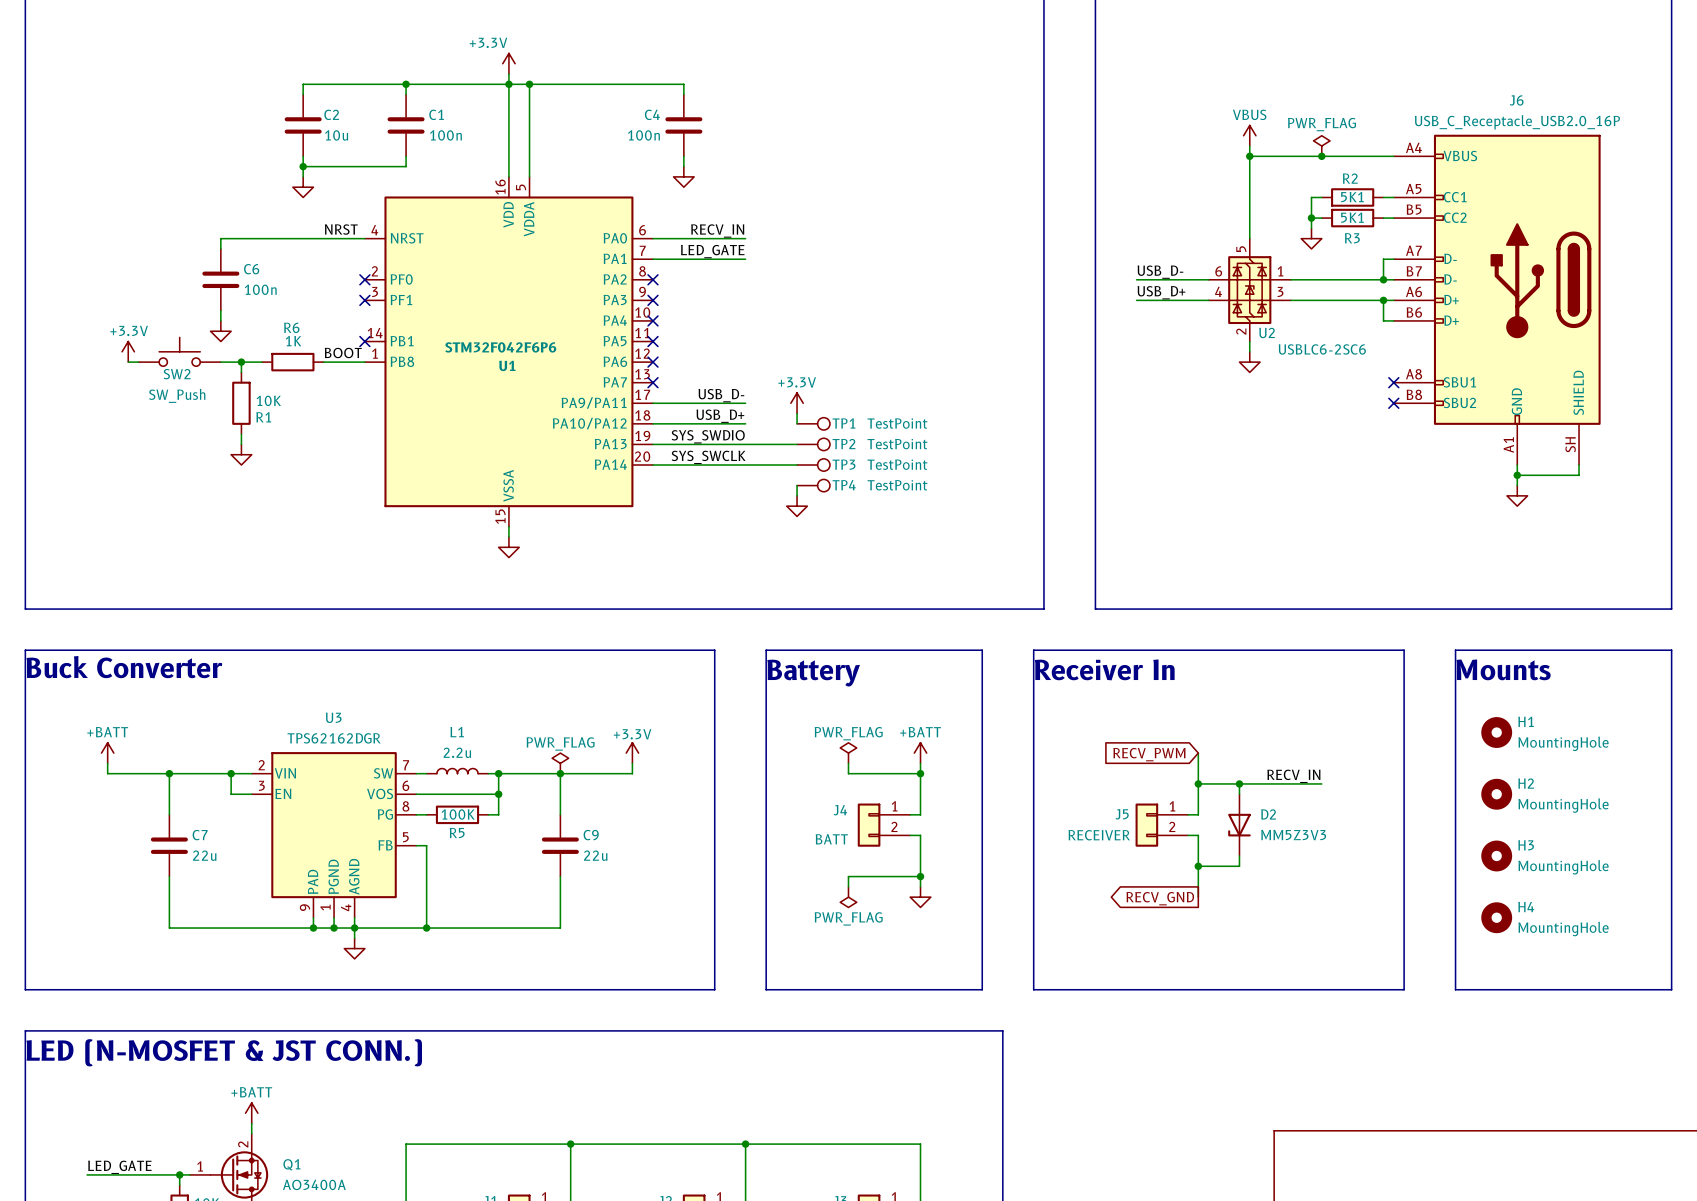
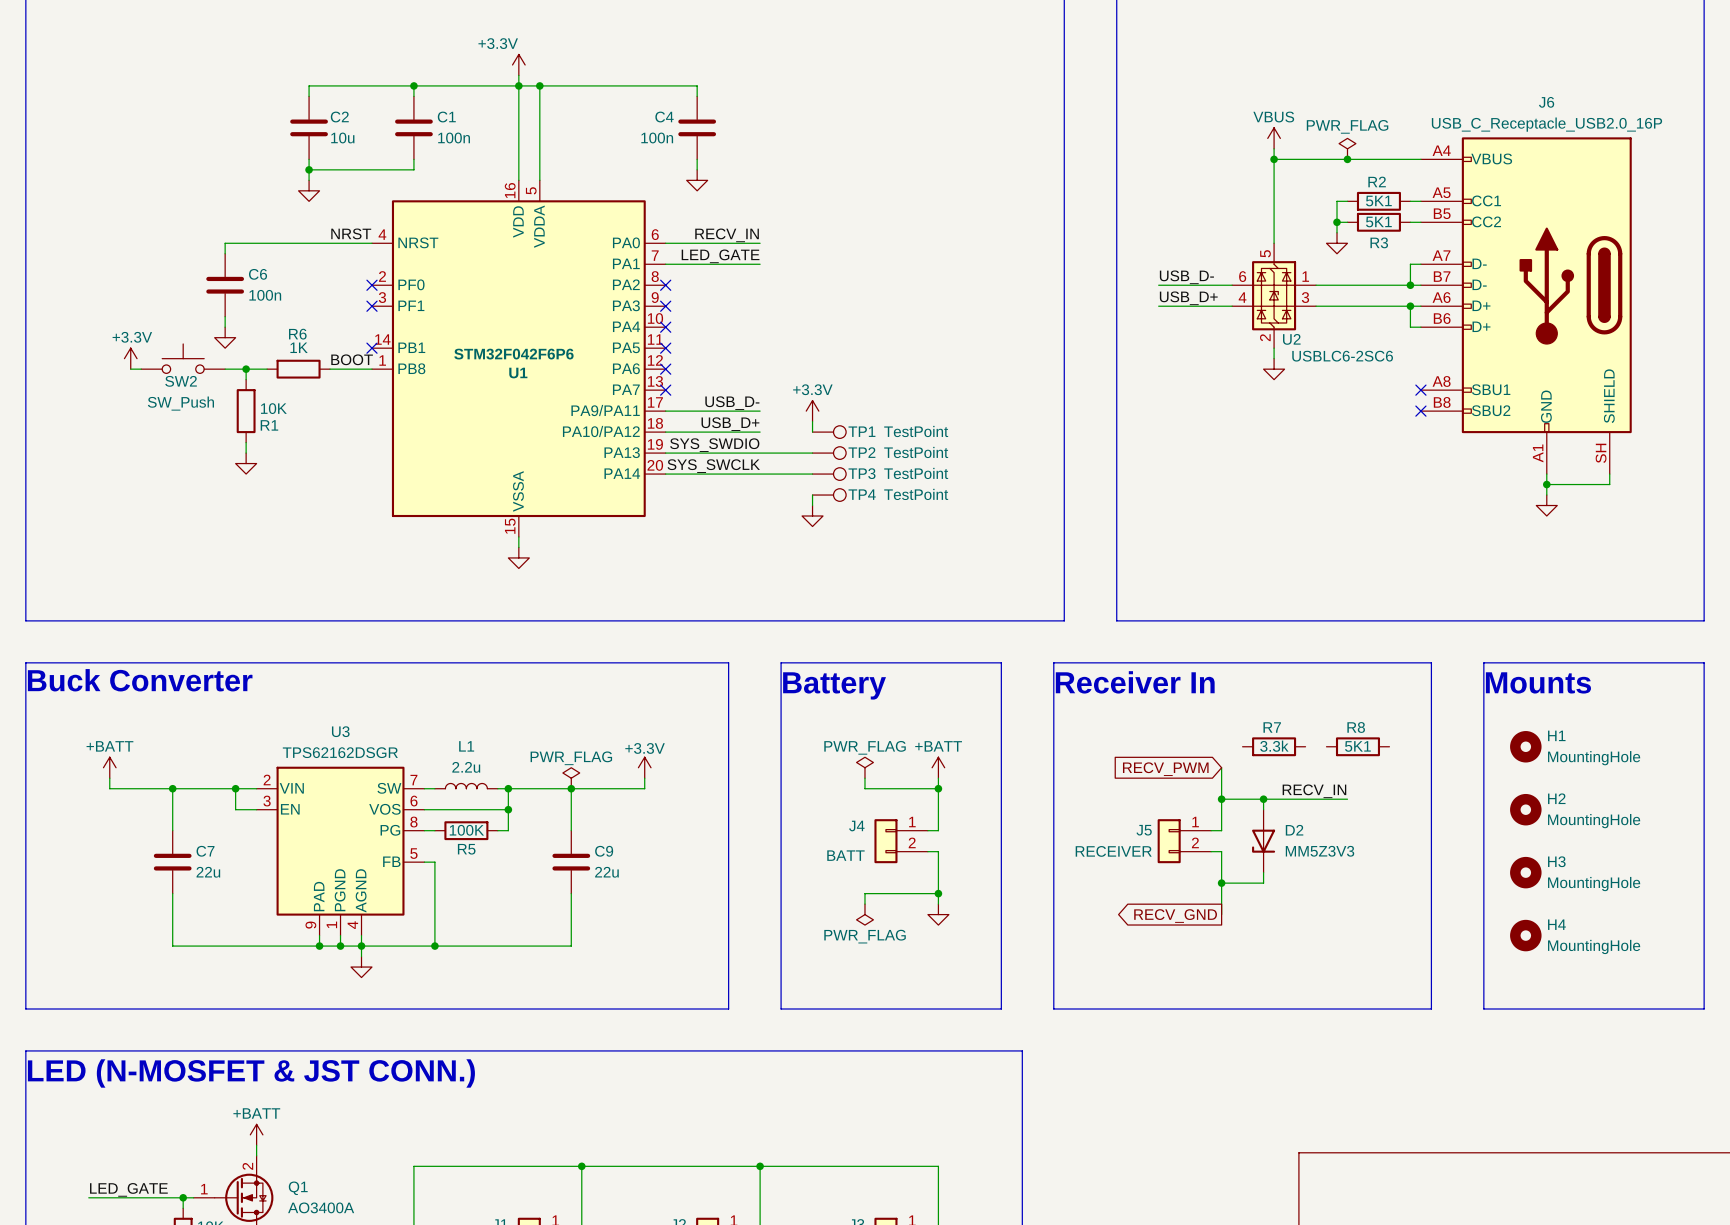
R7: none -> 3.3k (1274, 746)
R8: none -> 5K1 (1357, 746)
U3 value: TPS62162DGR (334, 738) -> TPS62162DSGR (340, 752)

